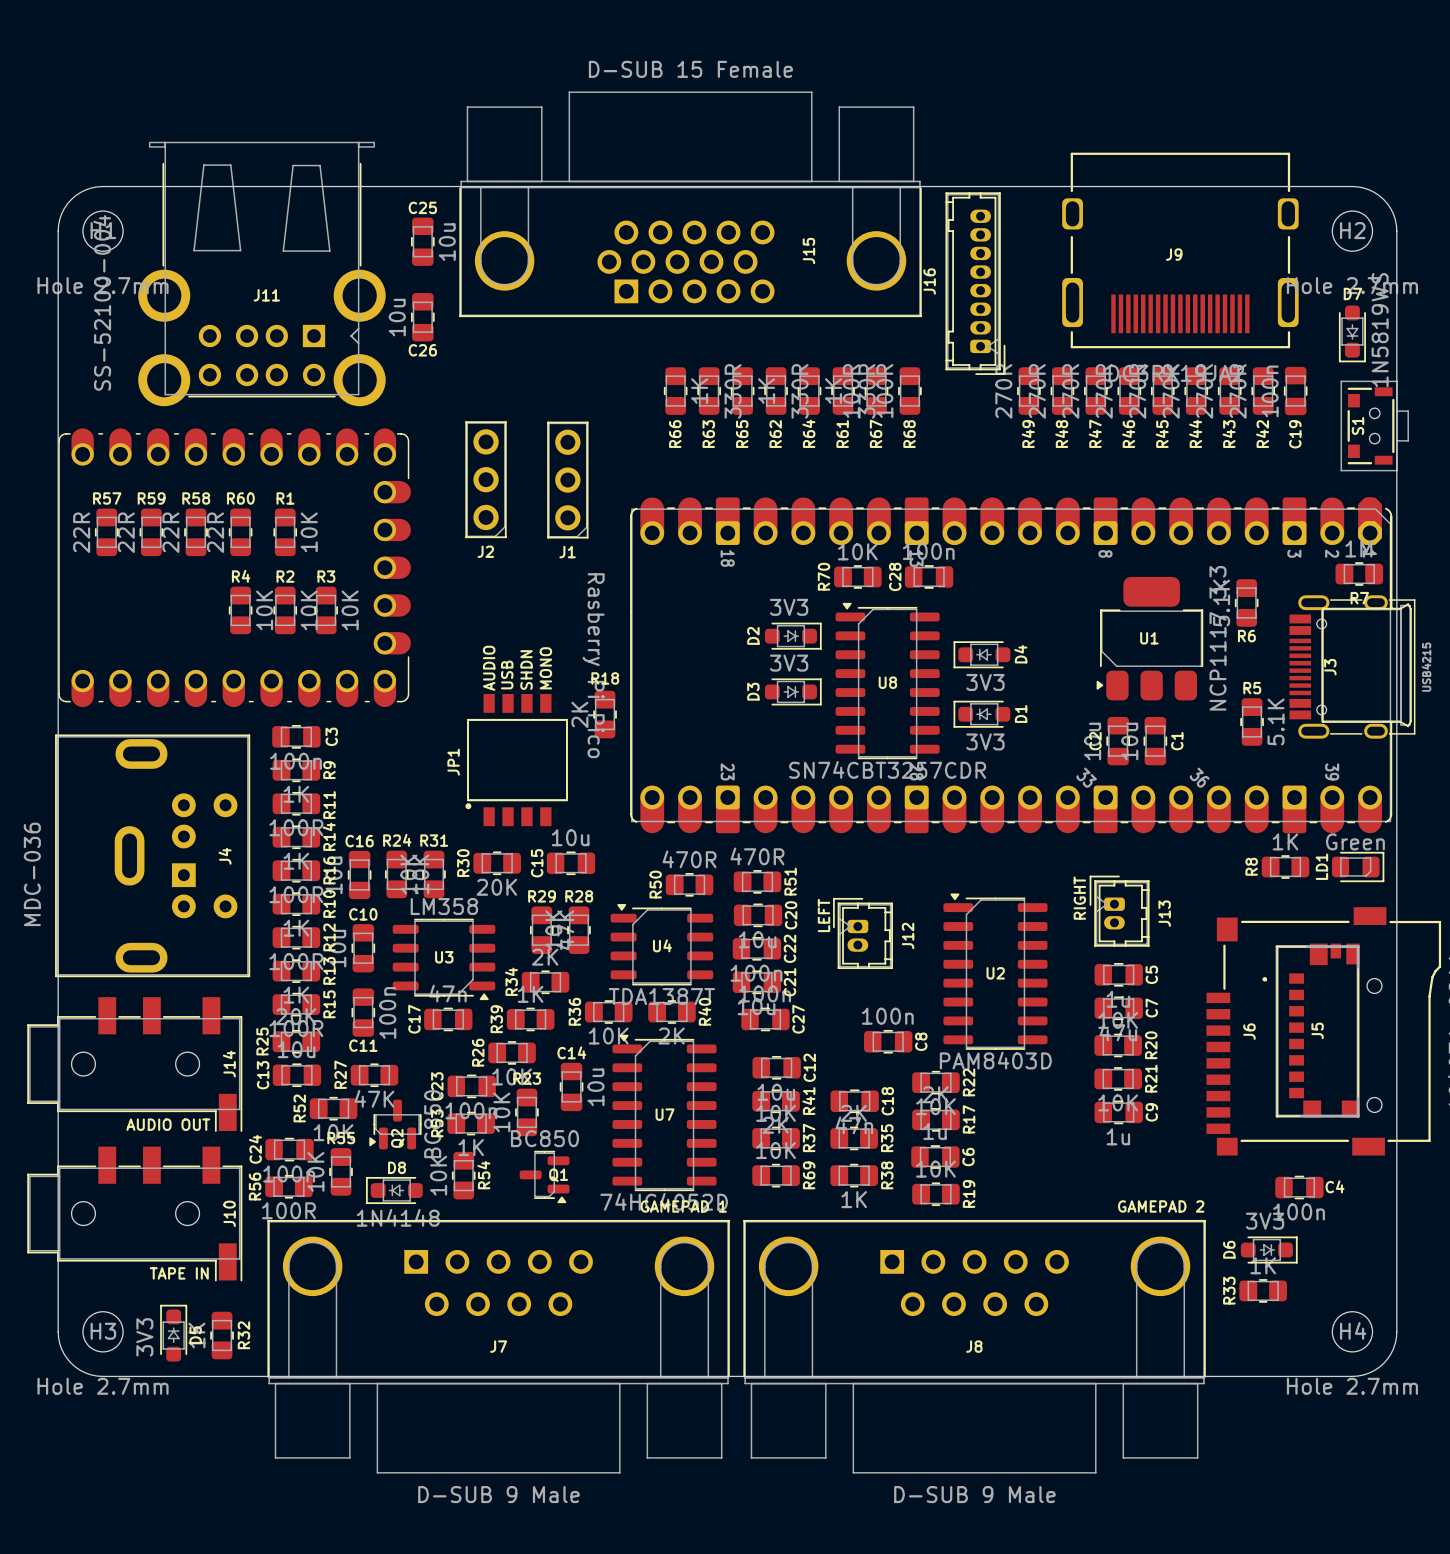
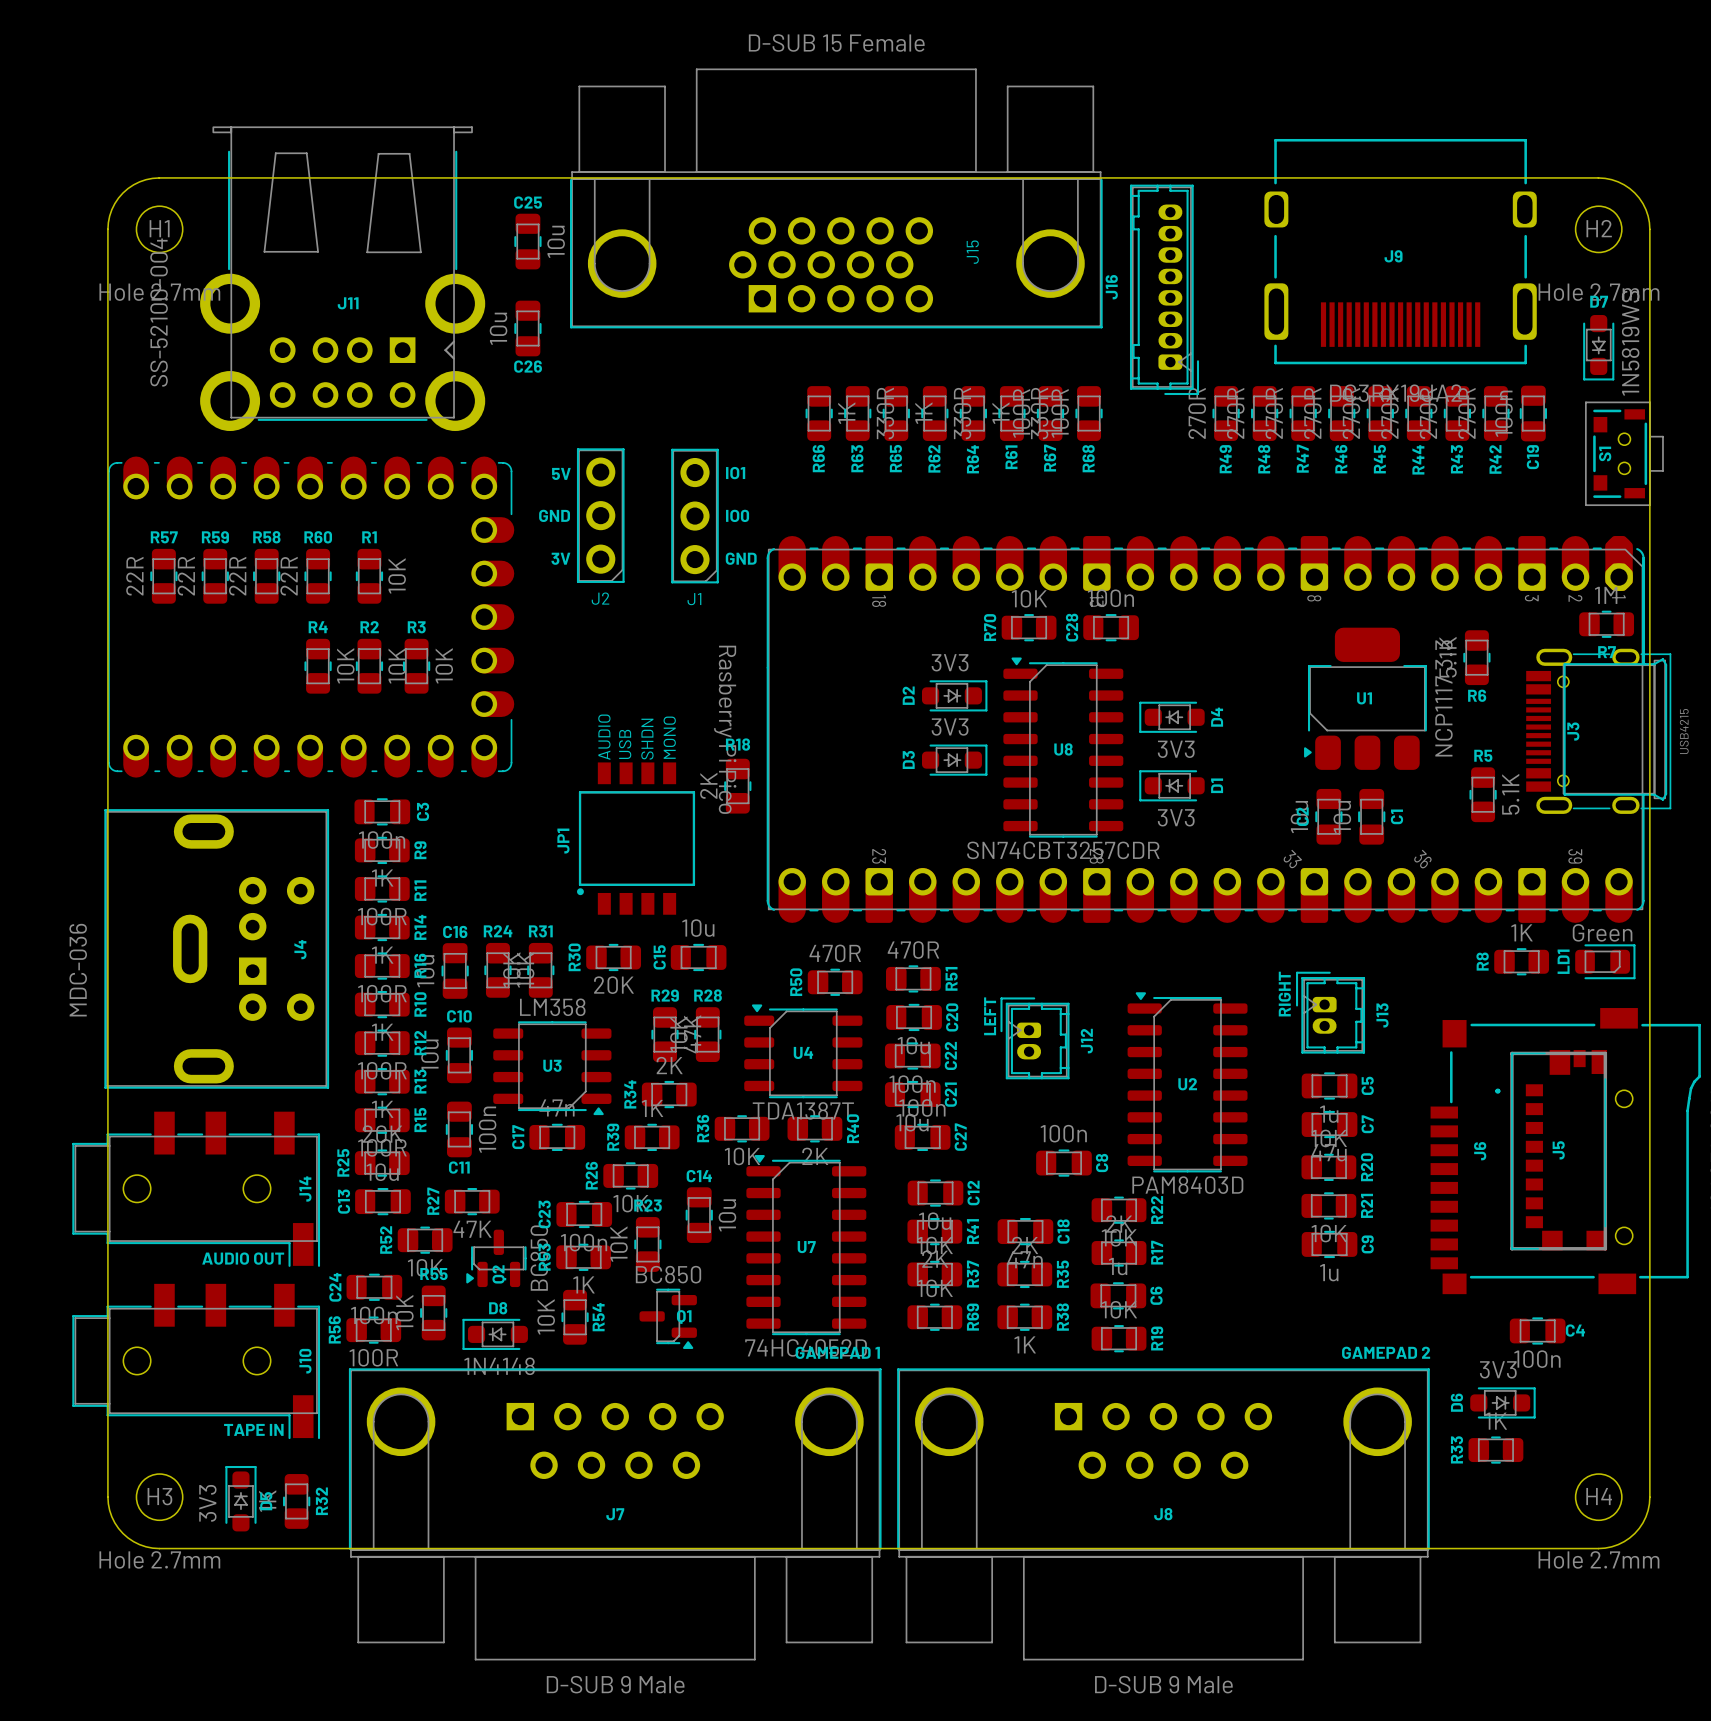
text: none -> IO1 (735, 473)
text: none -> 5V (561, 473)
text: none -> GND (554, 515)
text: none -> IO0 (737, 515)
text: none -> 3V (560, 558)
text: none -> GND (741, 558)

